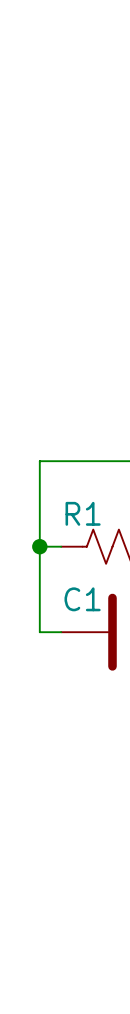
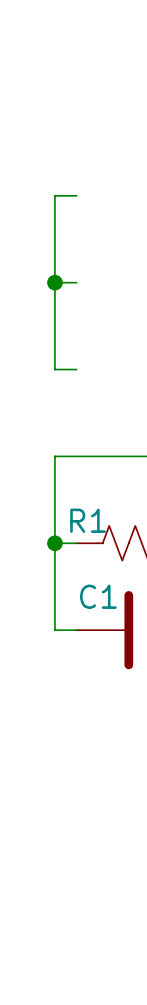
wire: none -> (76, 195) (54, 195) (54, 369) (76, 369)
wire: none -> (54, 282) (76, 282)
junction: none -> (54, 282)
R1 name position: R1 (83, 513) -> R1 (88, 520)

